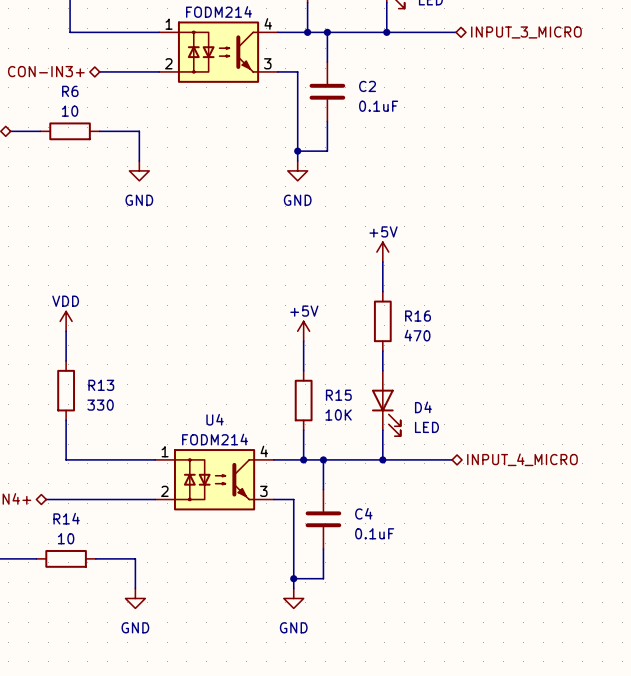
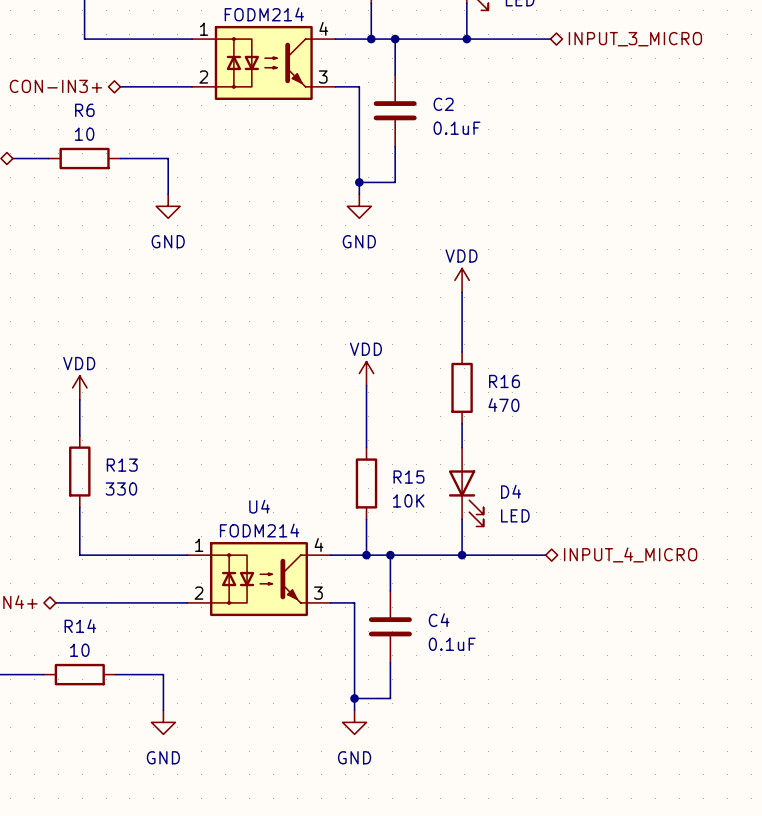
power symbol: none -> VDD (462, 280)
power symbol: +5V (382, 252) -> none
power symbol: none -> VDD (366, 373)
power symbol: +5V (303, 331) -> none

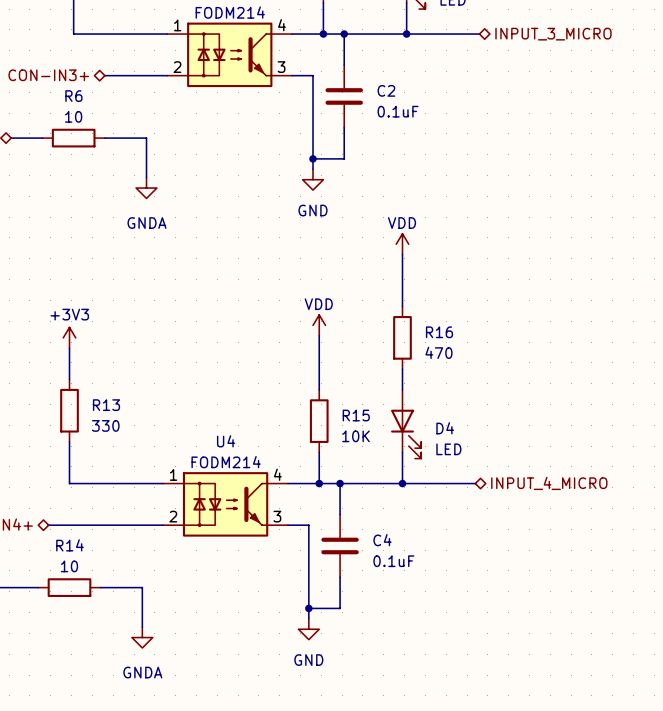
power symbol: GND (168, 206) -> none
power symbol: none -> GNDA (146, 188)
power symbol: VDD (79, 387) -> +3V3 (69, 337)
power symbol: GND (163, 722) -> none
power symbol: none -> GNDA (142, 637)

